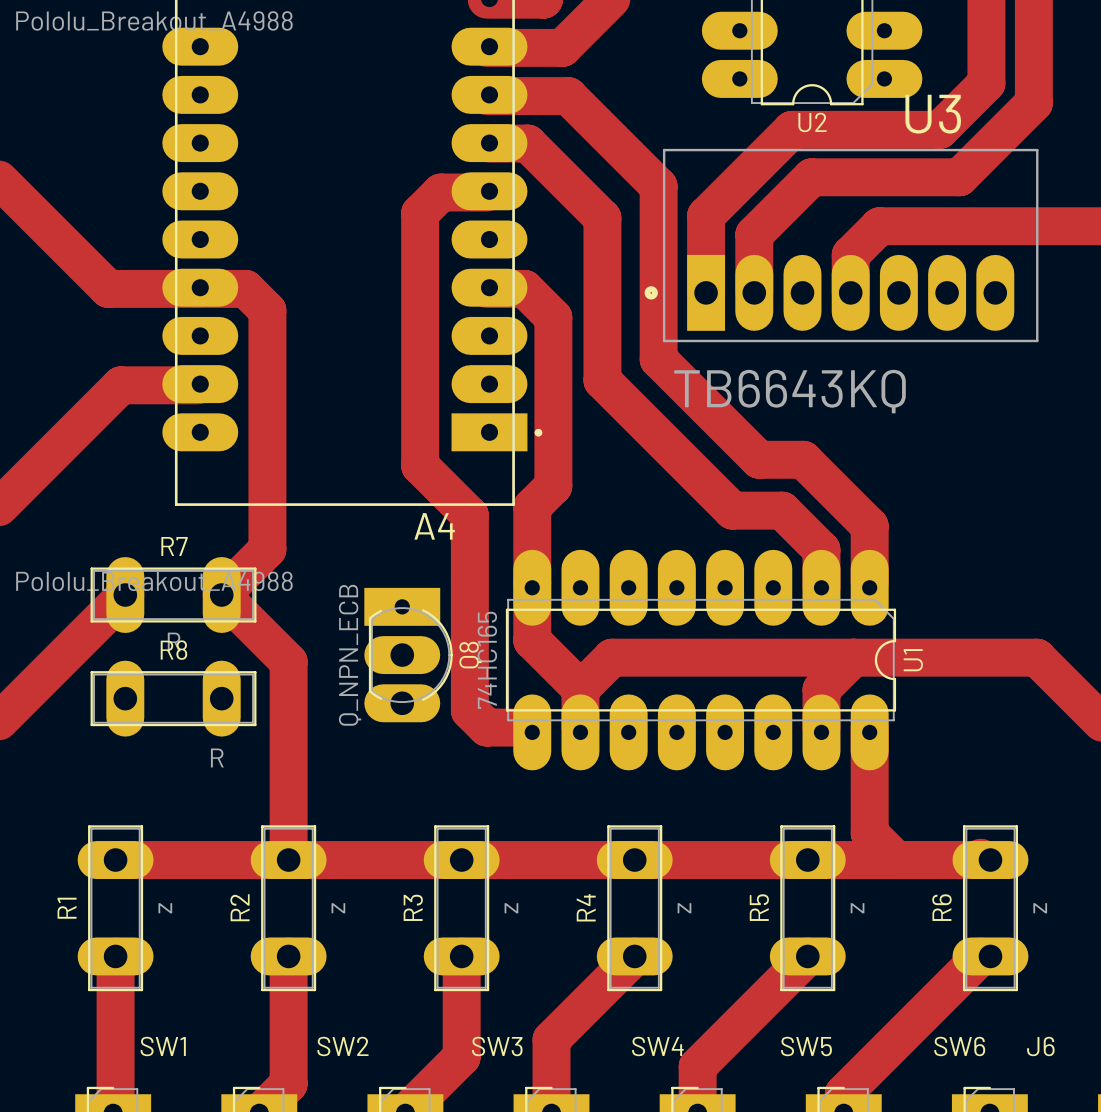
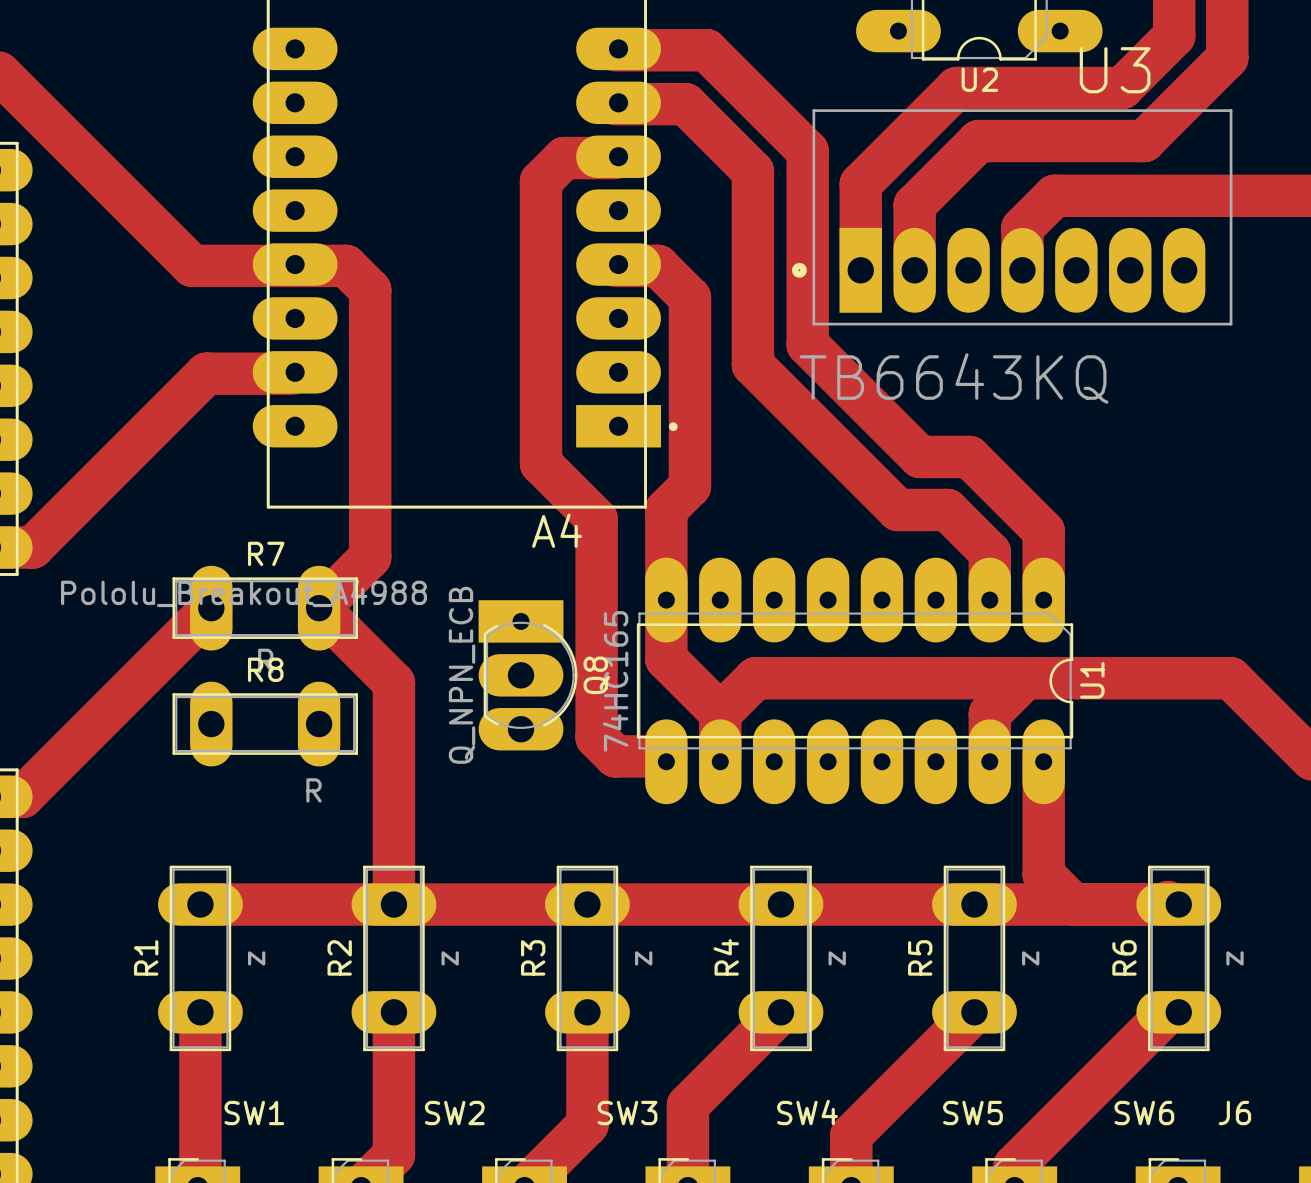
track: (489, 143) (527, 143) (602, 218) (602, 380) (732, 510) (782, 510) (821, 549) -> (615, 104) (685, 104) (752, 171) (752, 364) (898, 510) (947, 510) (989, 552) (989, 557)

